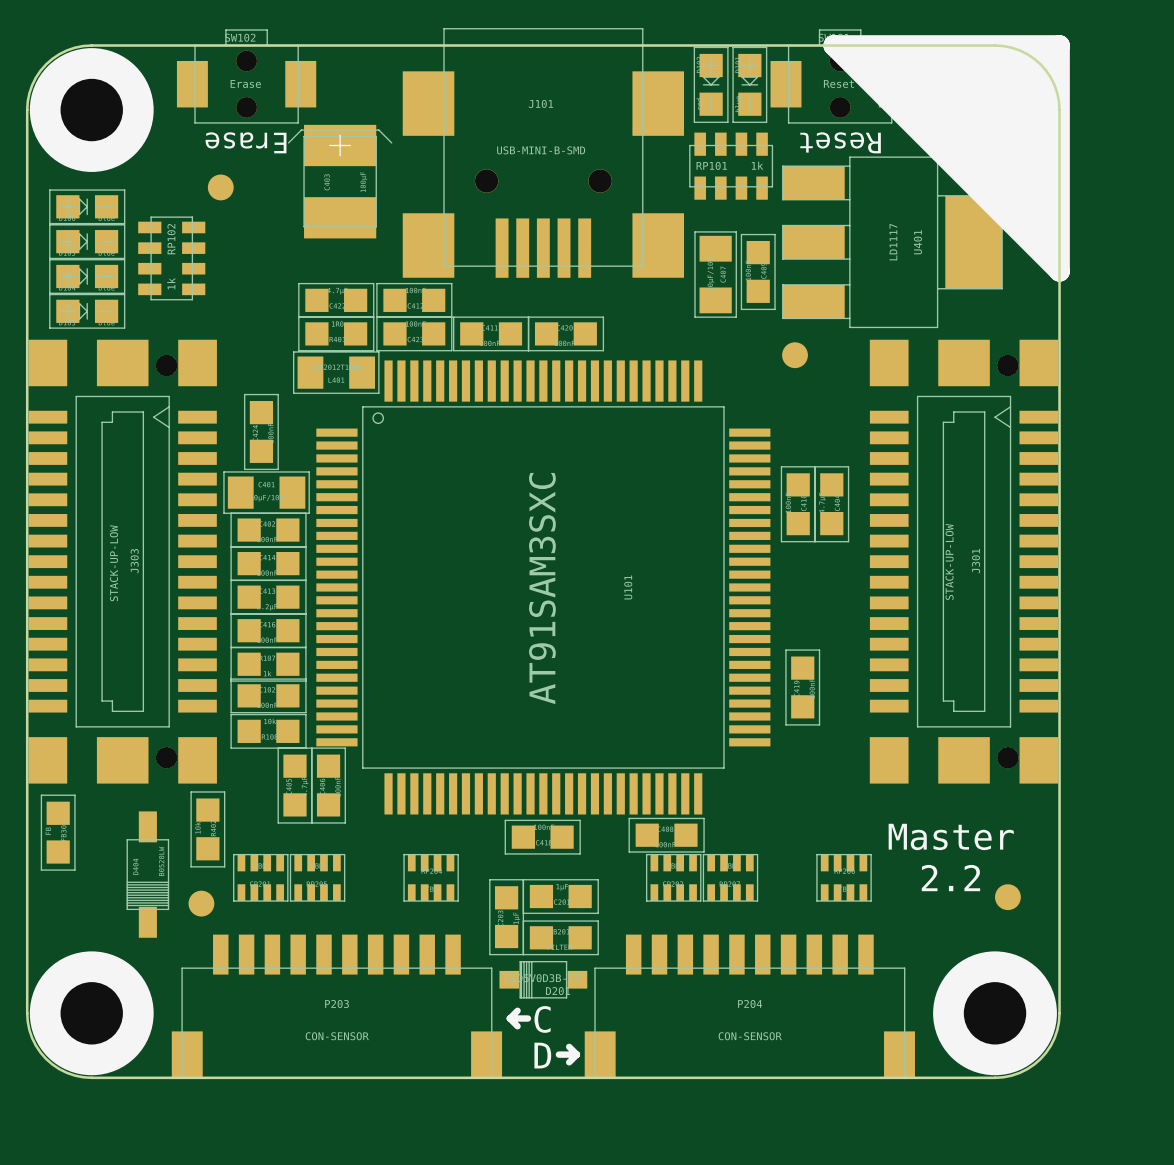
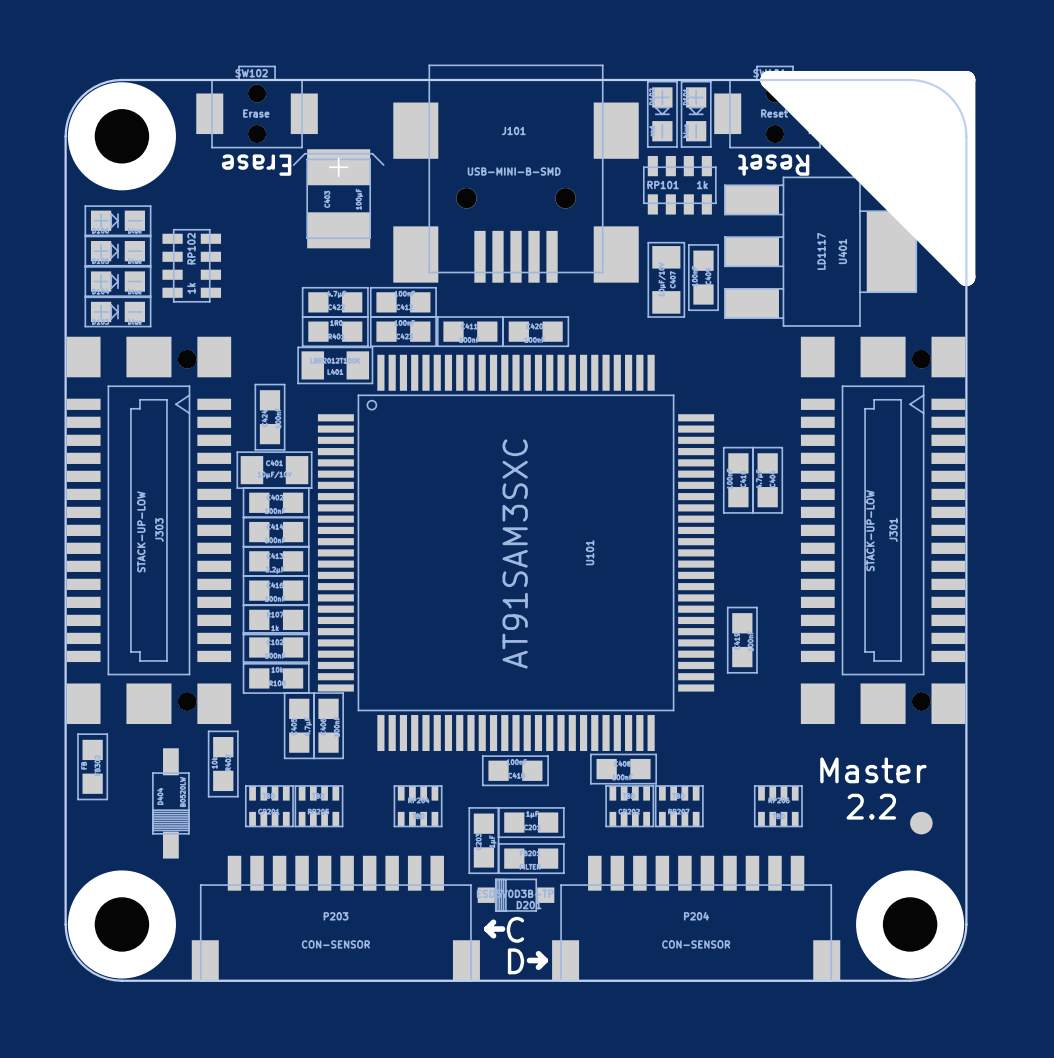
part: (220, 187) -> none
part: (795, 355) -> none
part: (201, 903) -> none

